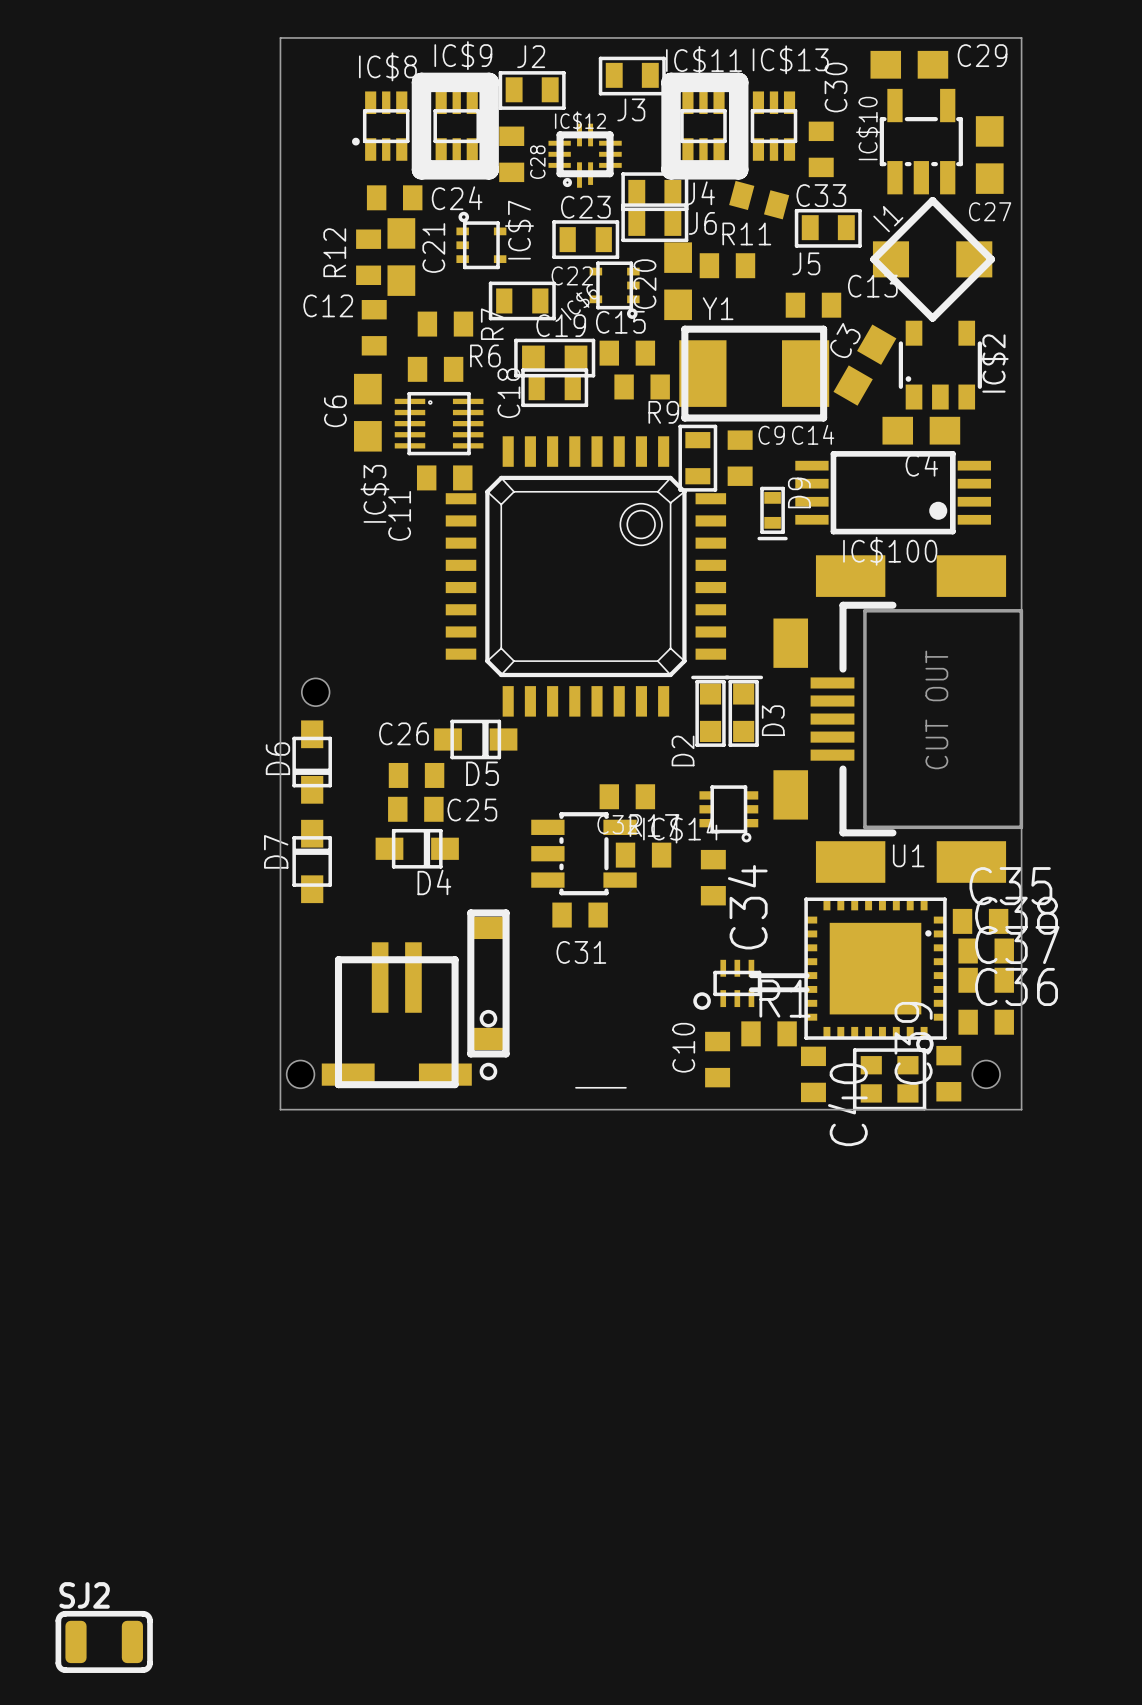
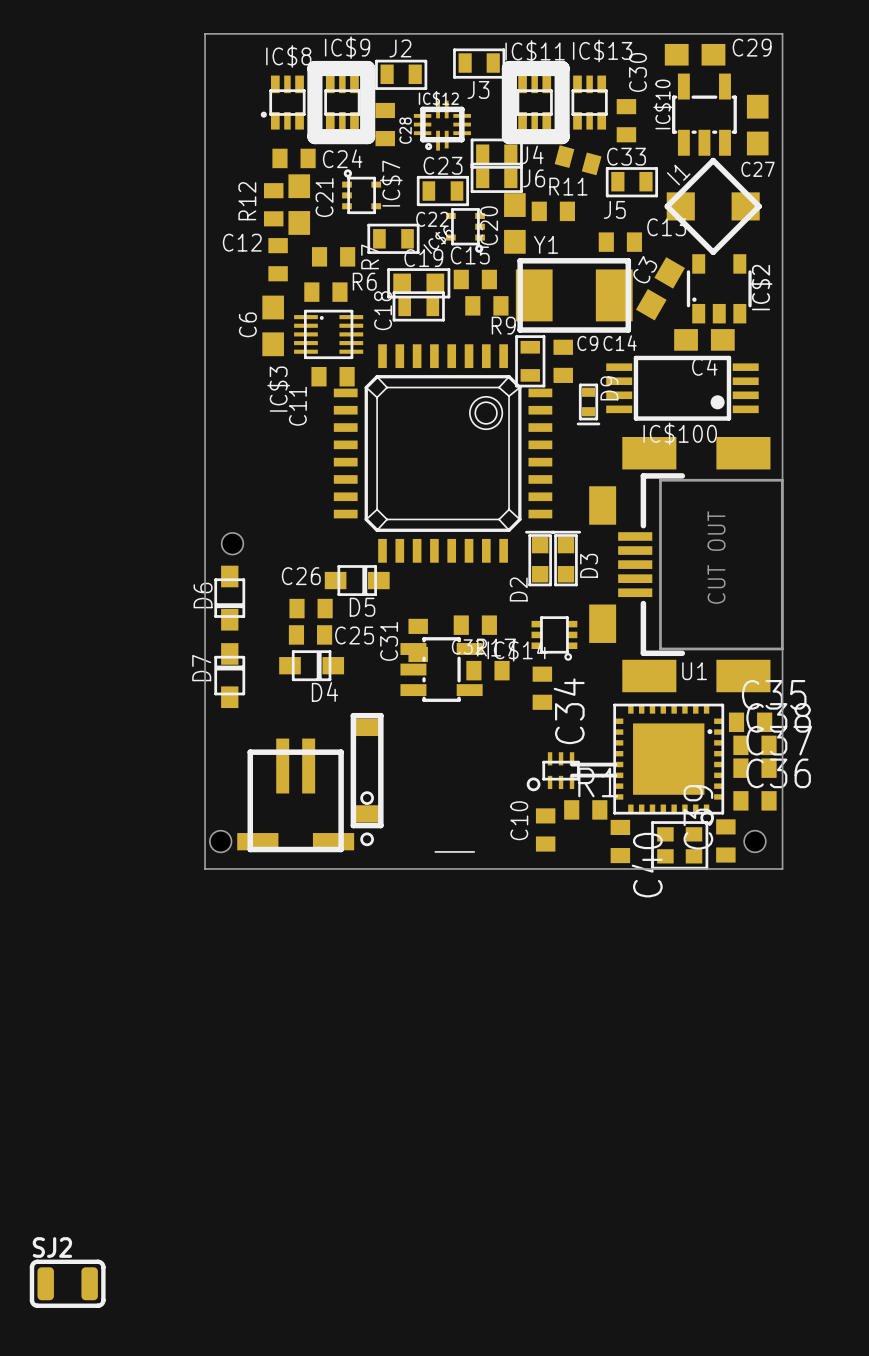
C31 rotation: 0° (580, 915) -> 90° clockwise (418, 640)
C31 position: (580, 915) -> (418, 640)

